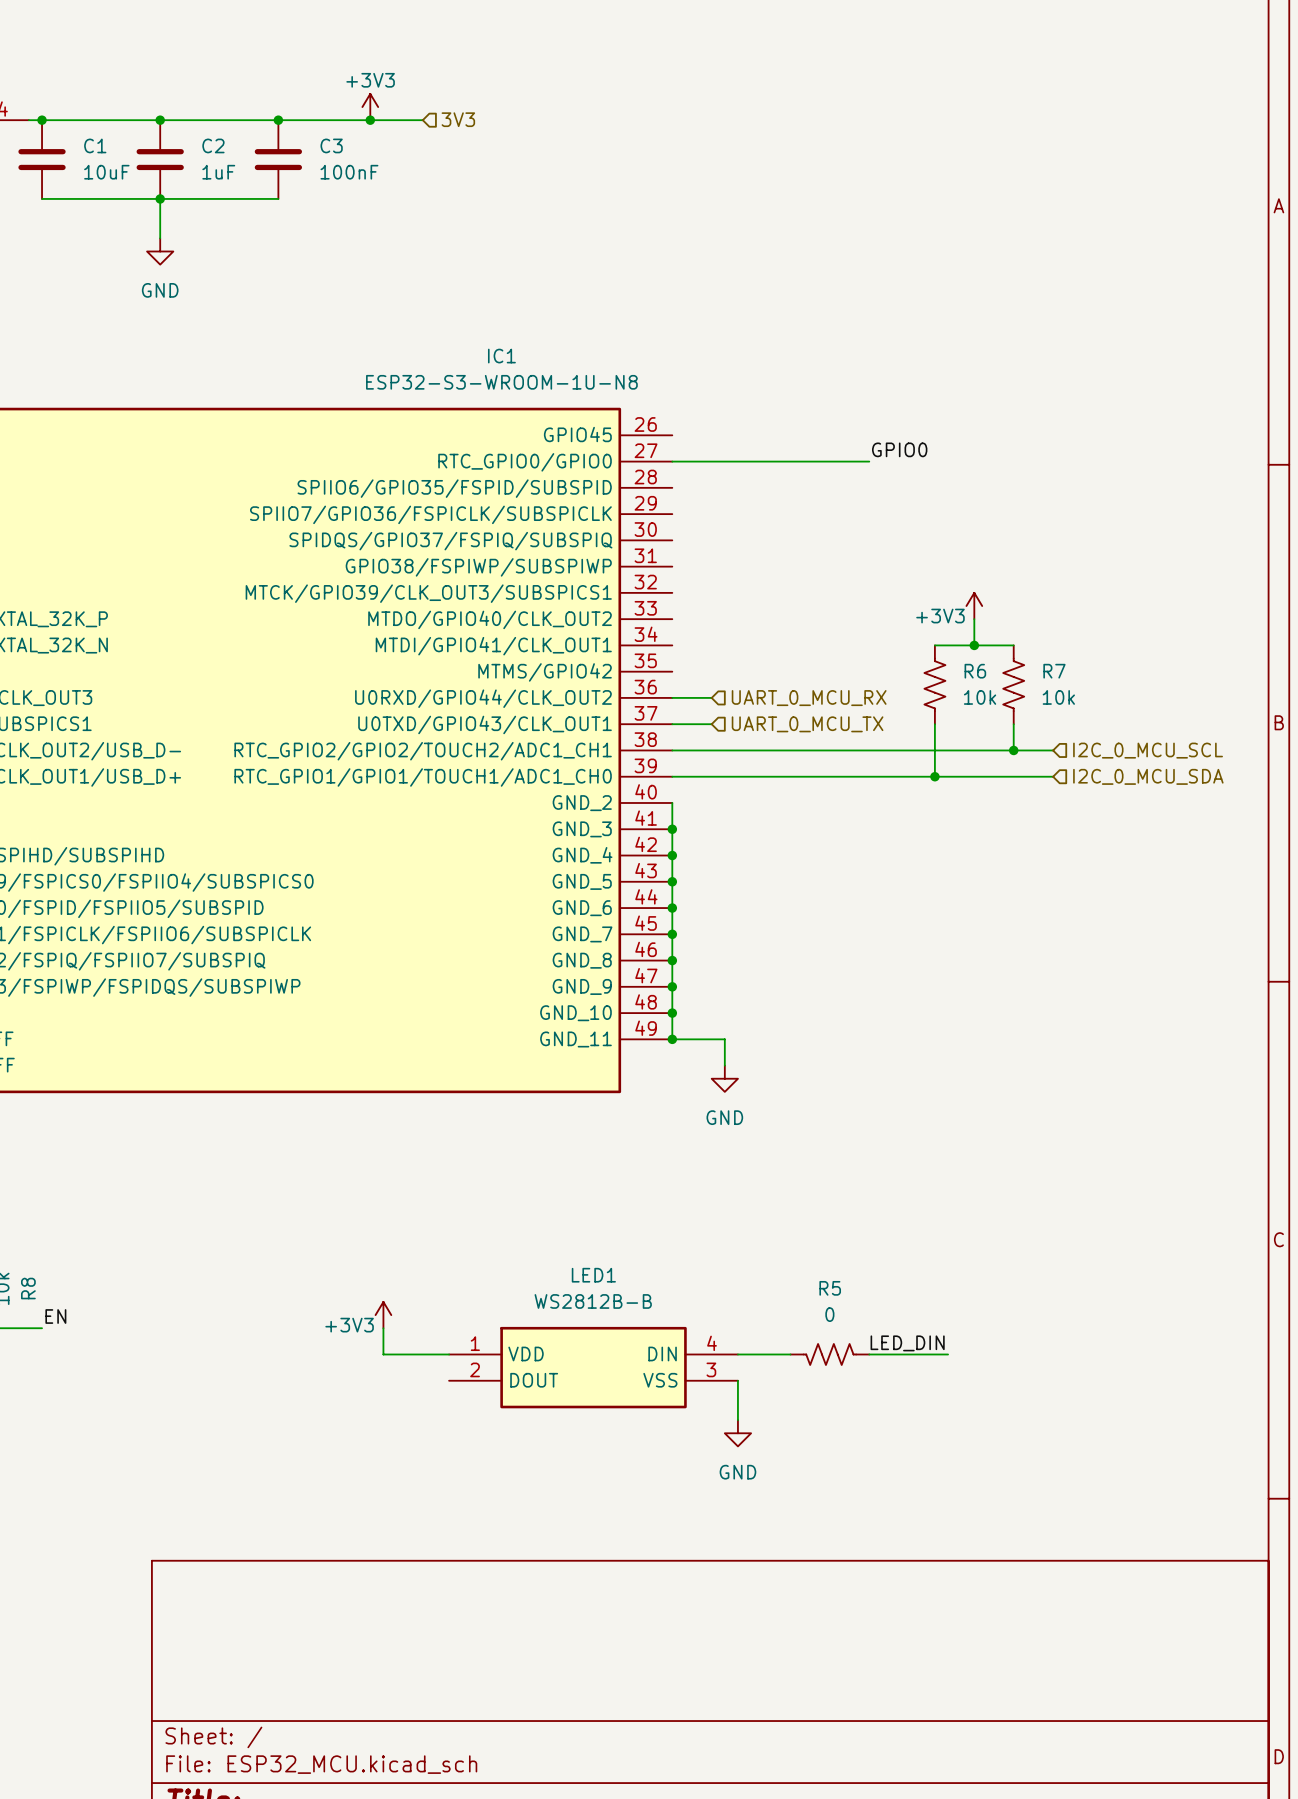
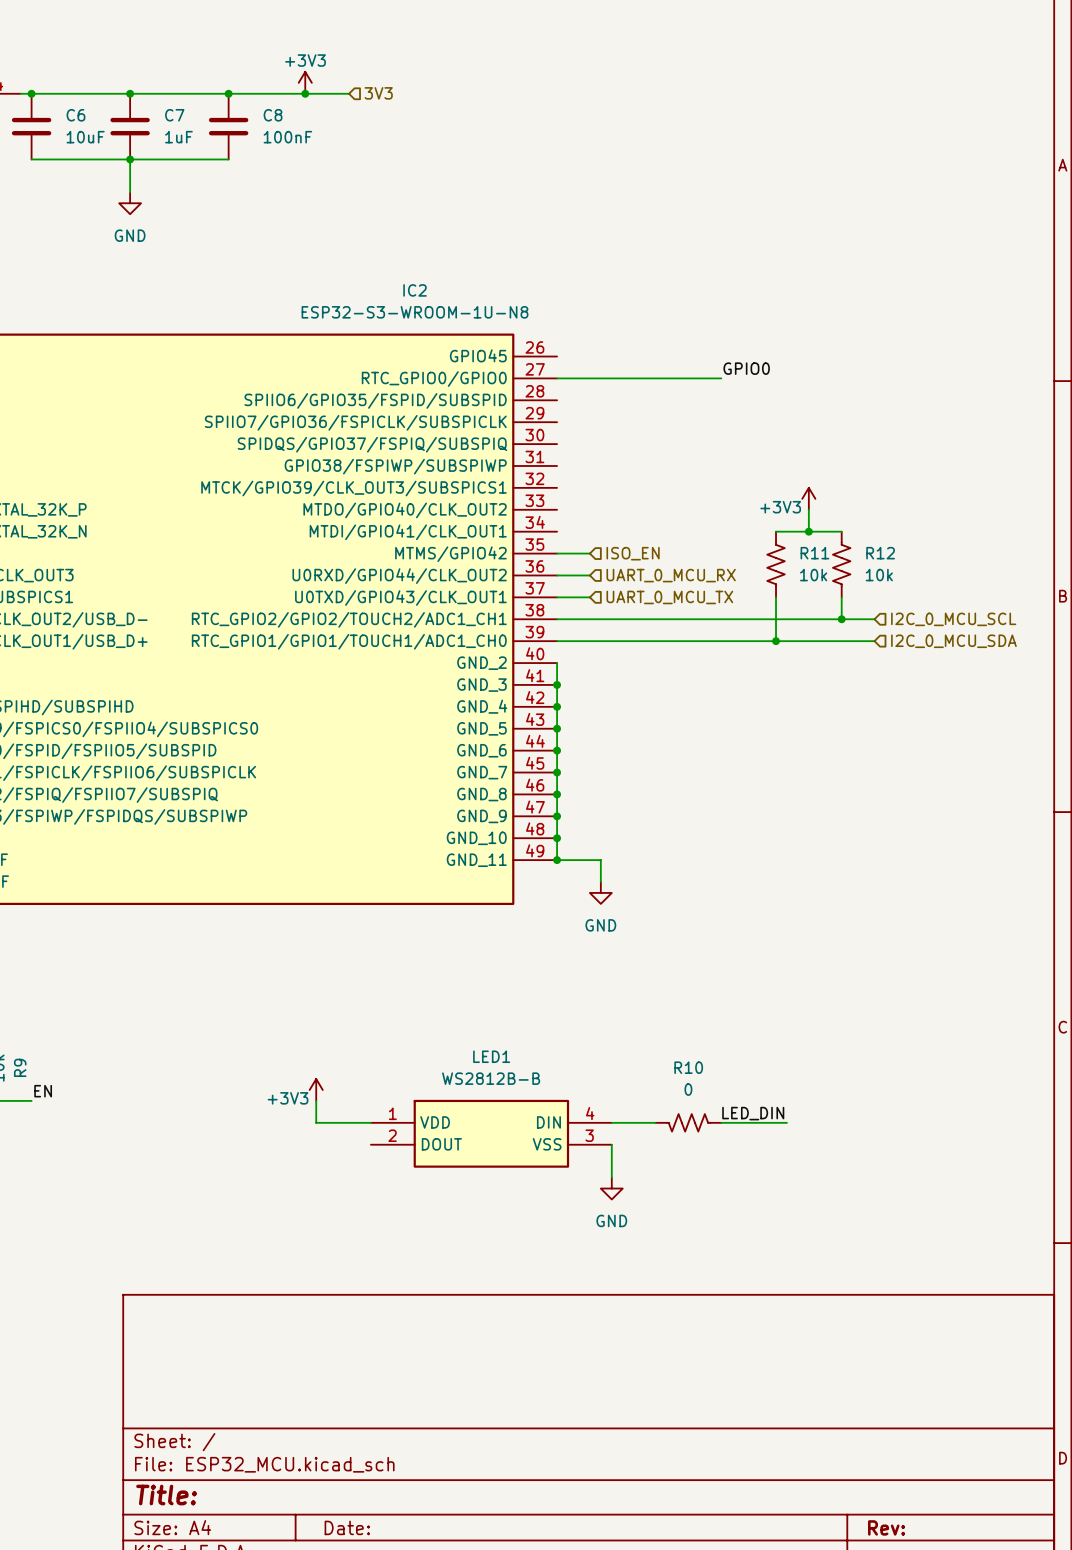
C1 name: C1 (95, 145) -> C6 (75, 115)
C2 name: C2 (213, 145) -> C7 (174, 115)
C3 name: C3 (331, 145) -> C8 (273, 115)
IC1 name: IC1 (501, 356) -> IC2 (415, 290)
wire: none -> (557, 553) (589, 553)
hierarchical label: none -> ISO_EN (633, 553)
R6 name: R6 (975, 671) -> R11 (814, 553)
R7 name: R7 (1054, 671) -> R12 (880, 553)
R8 name: R8 (28, 1288) -> R9 (20, 1067)
R5 name: R5 (830, 1288) -> R10 (688, 1067)

